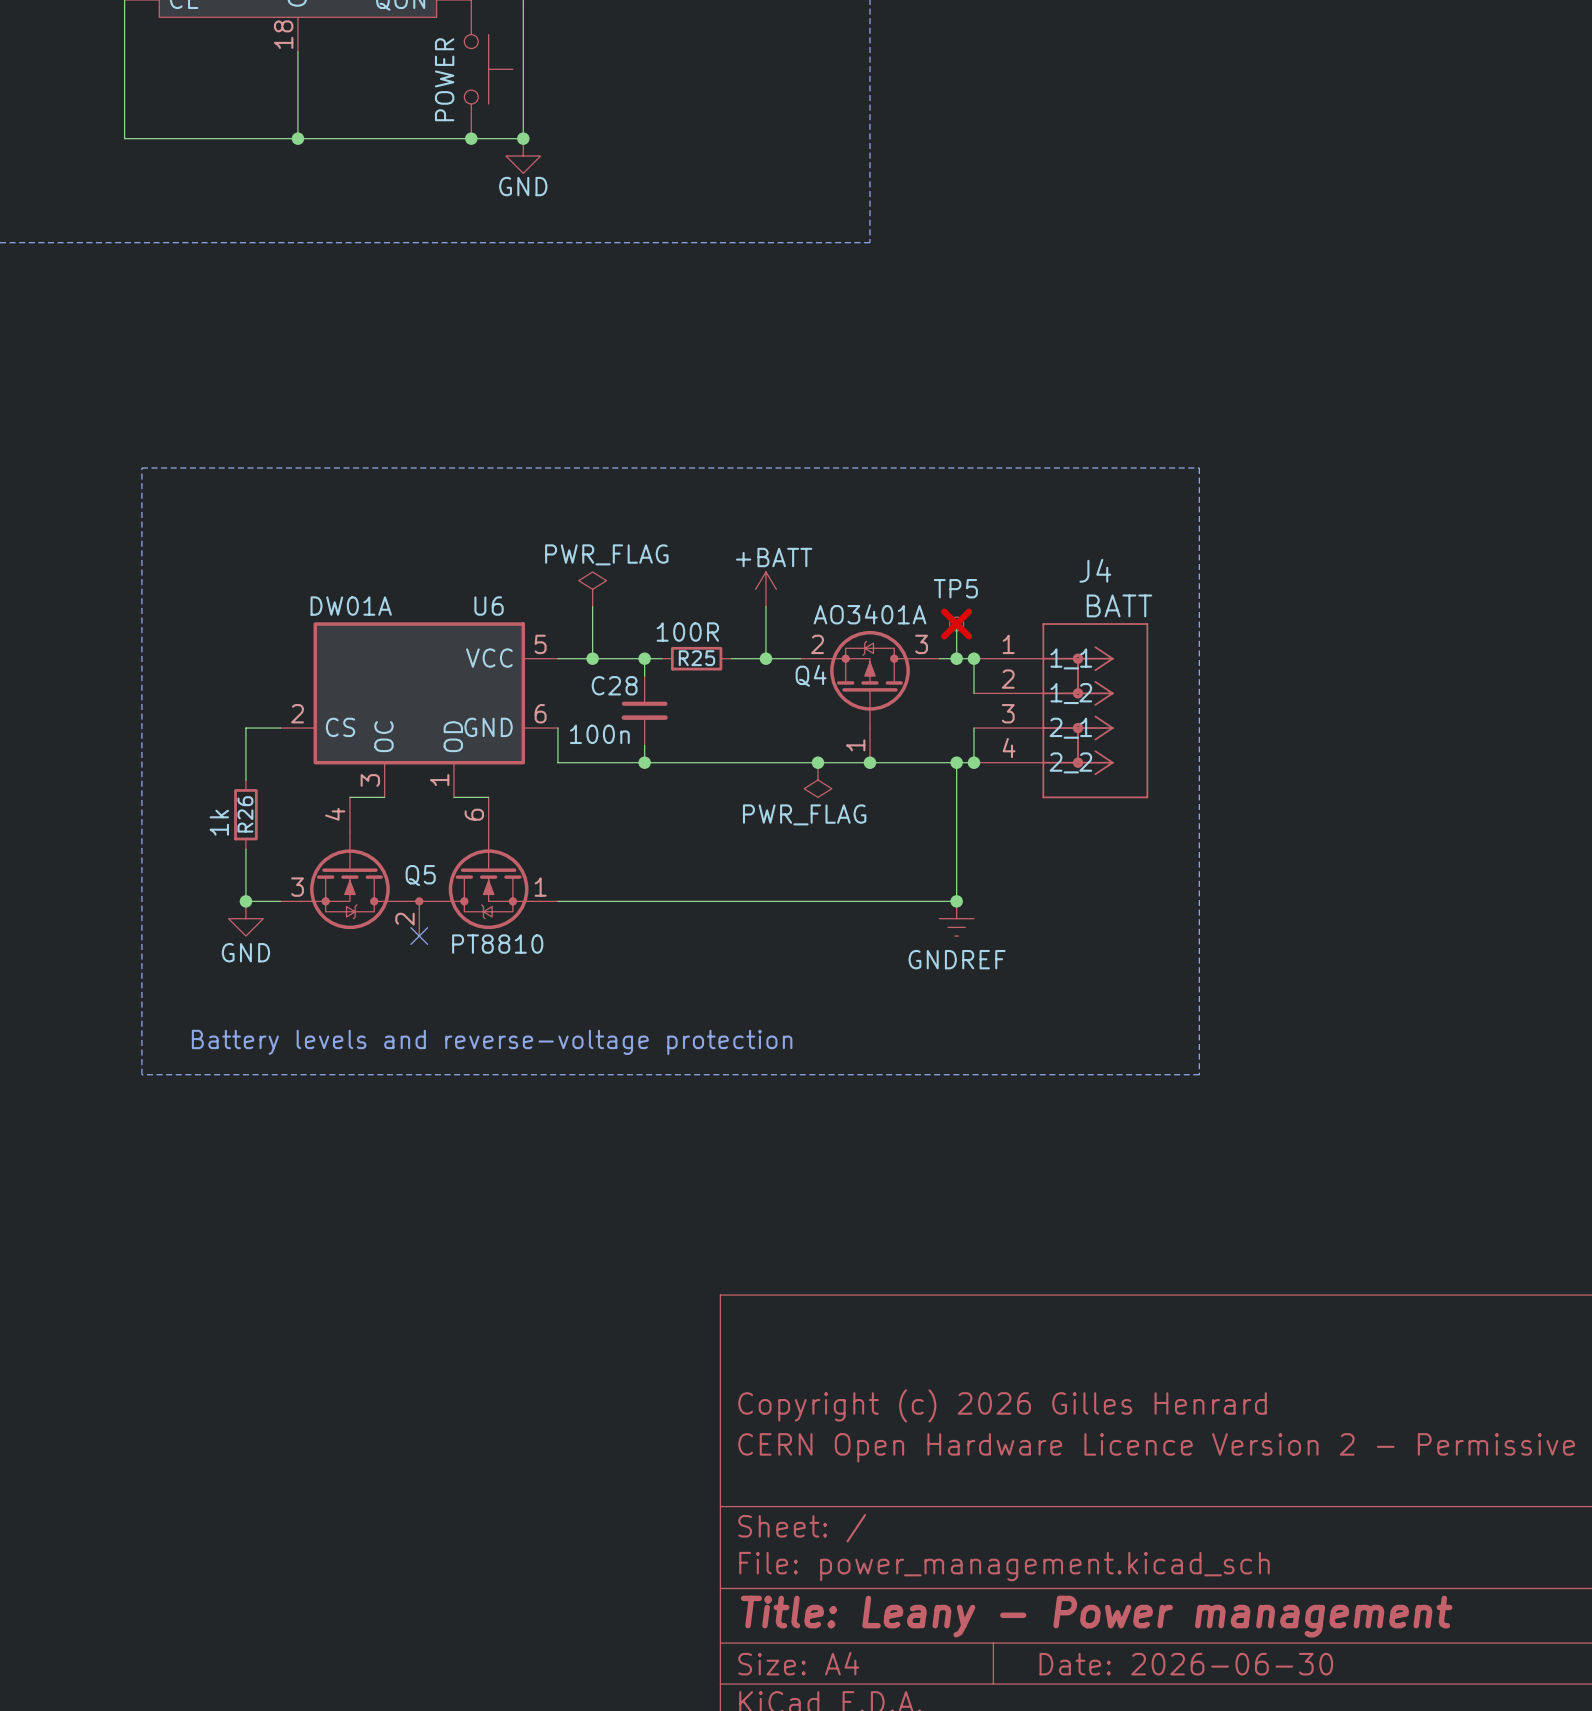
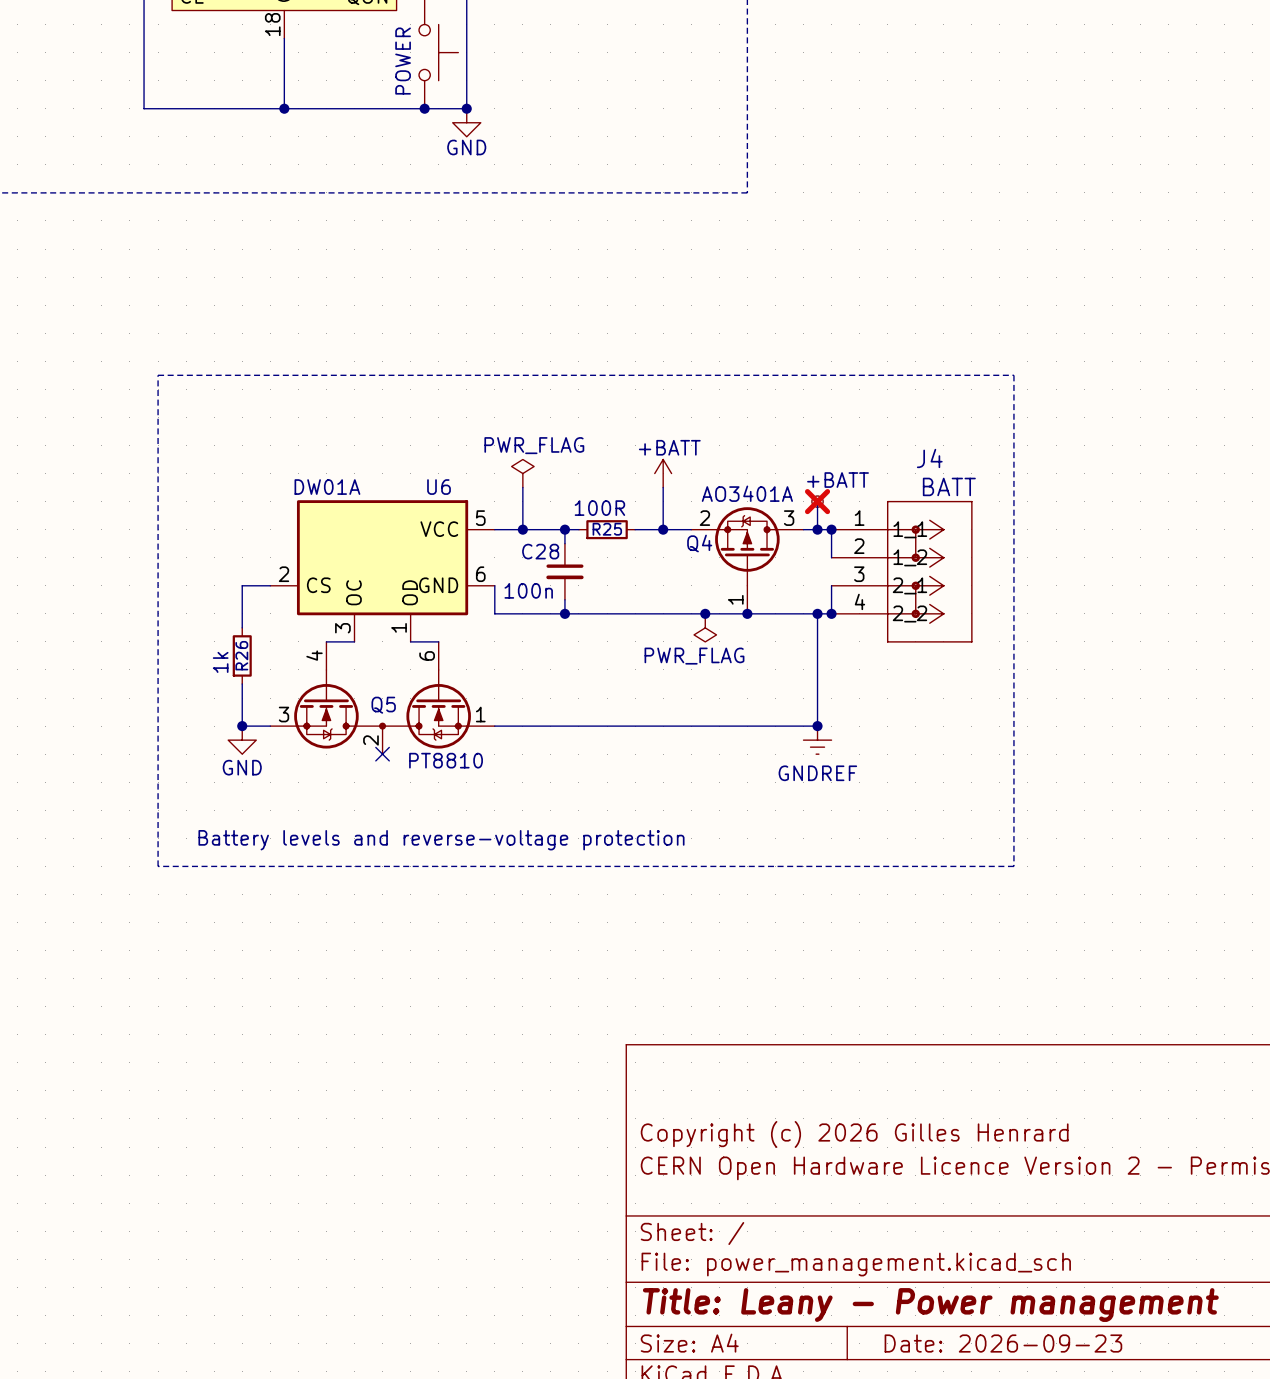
TP5 name: TP5 (955, 588) -> none
TP5 value: none -> +BATT (838, 480)
title block: Date: 2026-06-30 (1186, 1664) -> Date: 2026-09-23 (1003, 1343)

